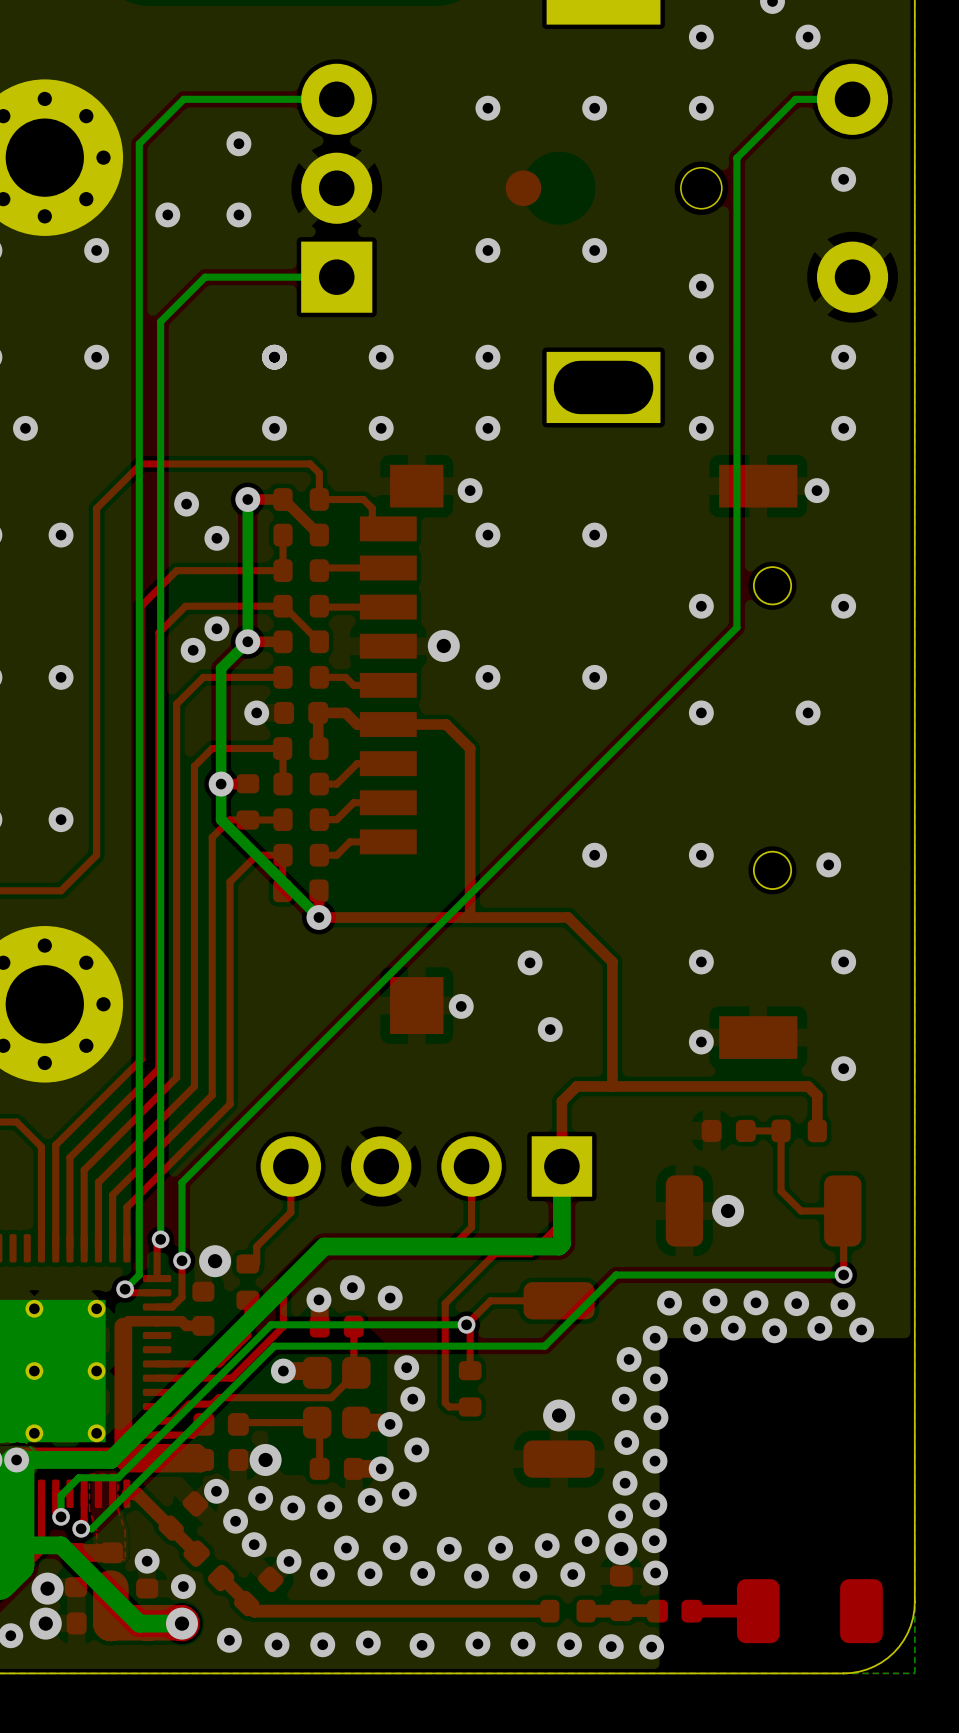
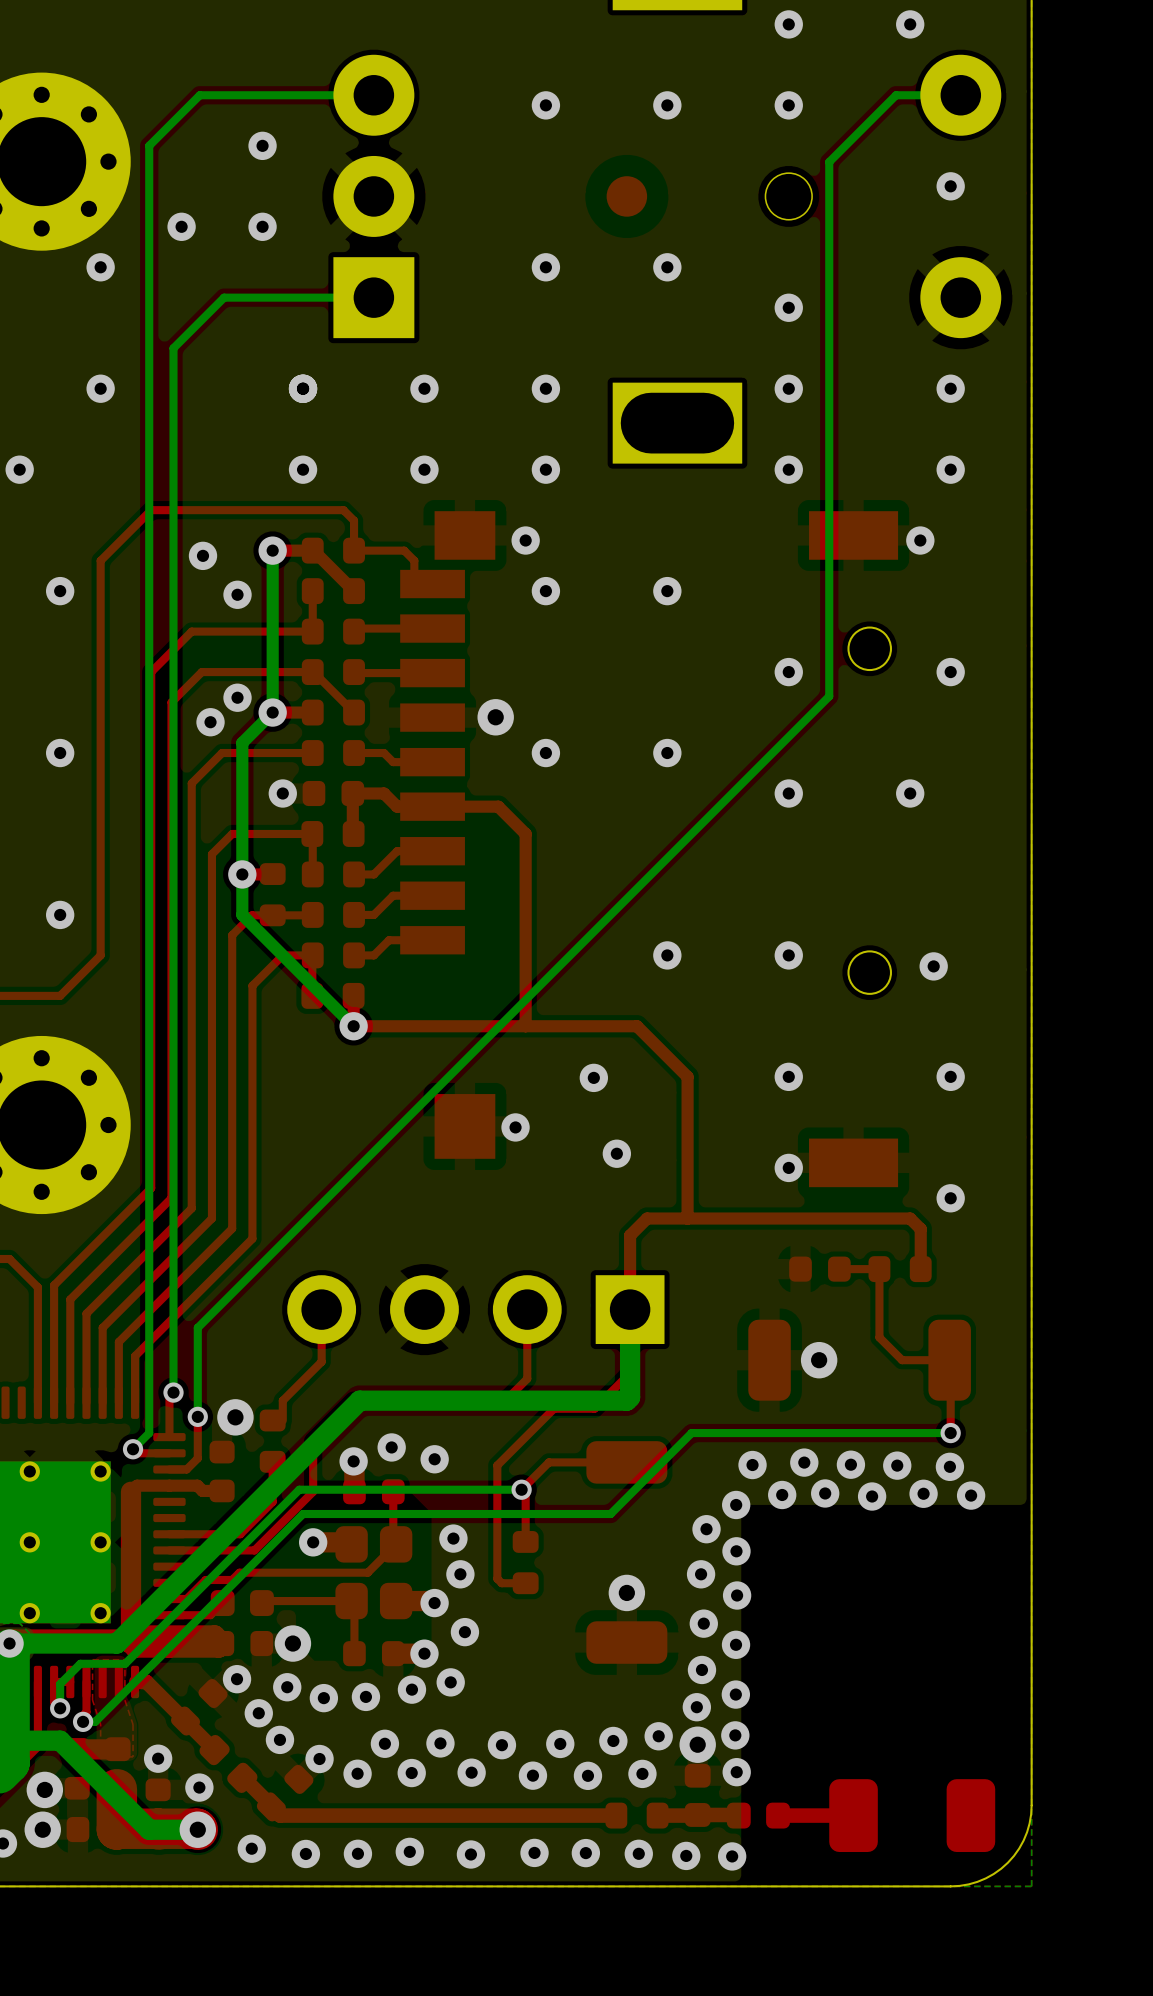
part position: (523, 188) -> (626, 196)

